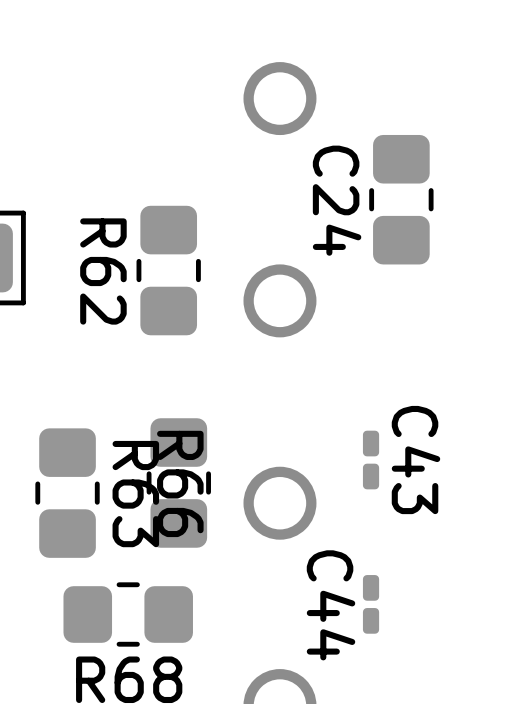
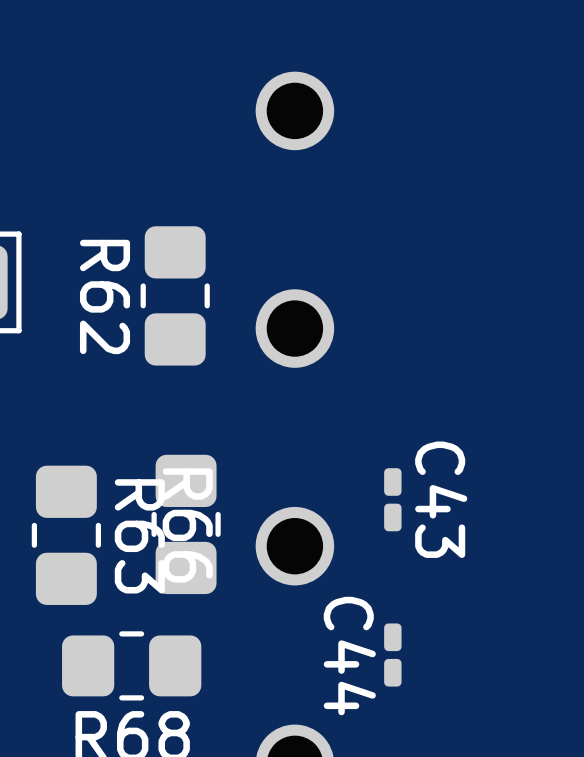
C24: (401, 199) -> none

